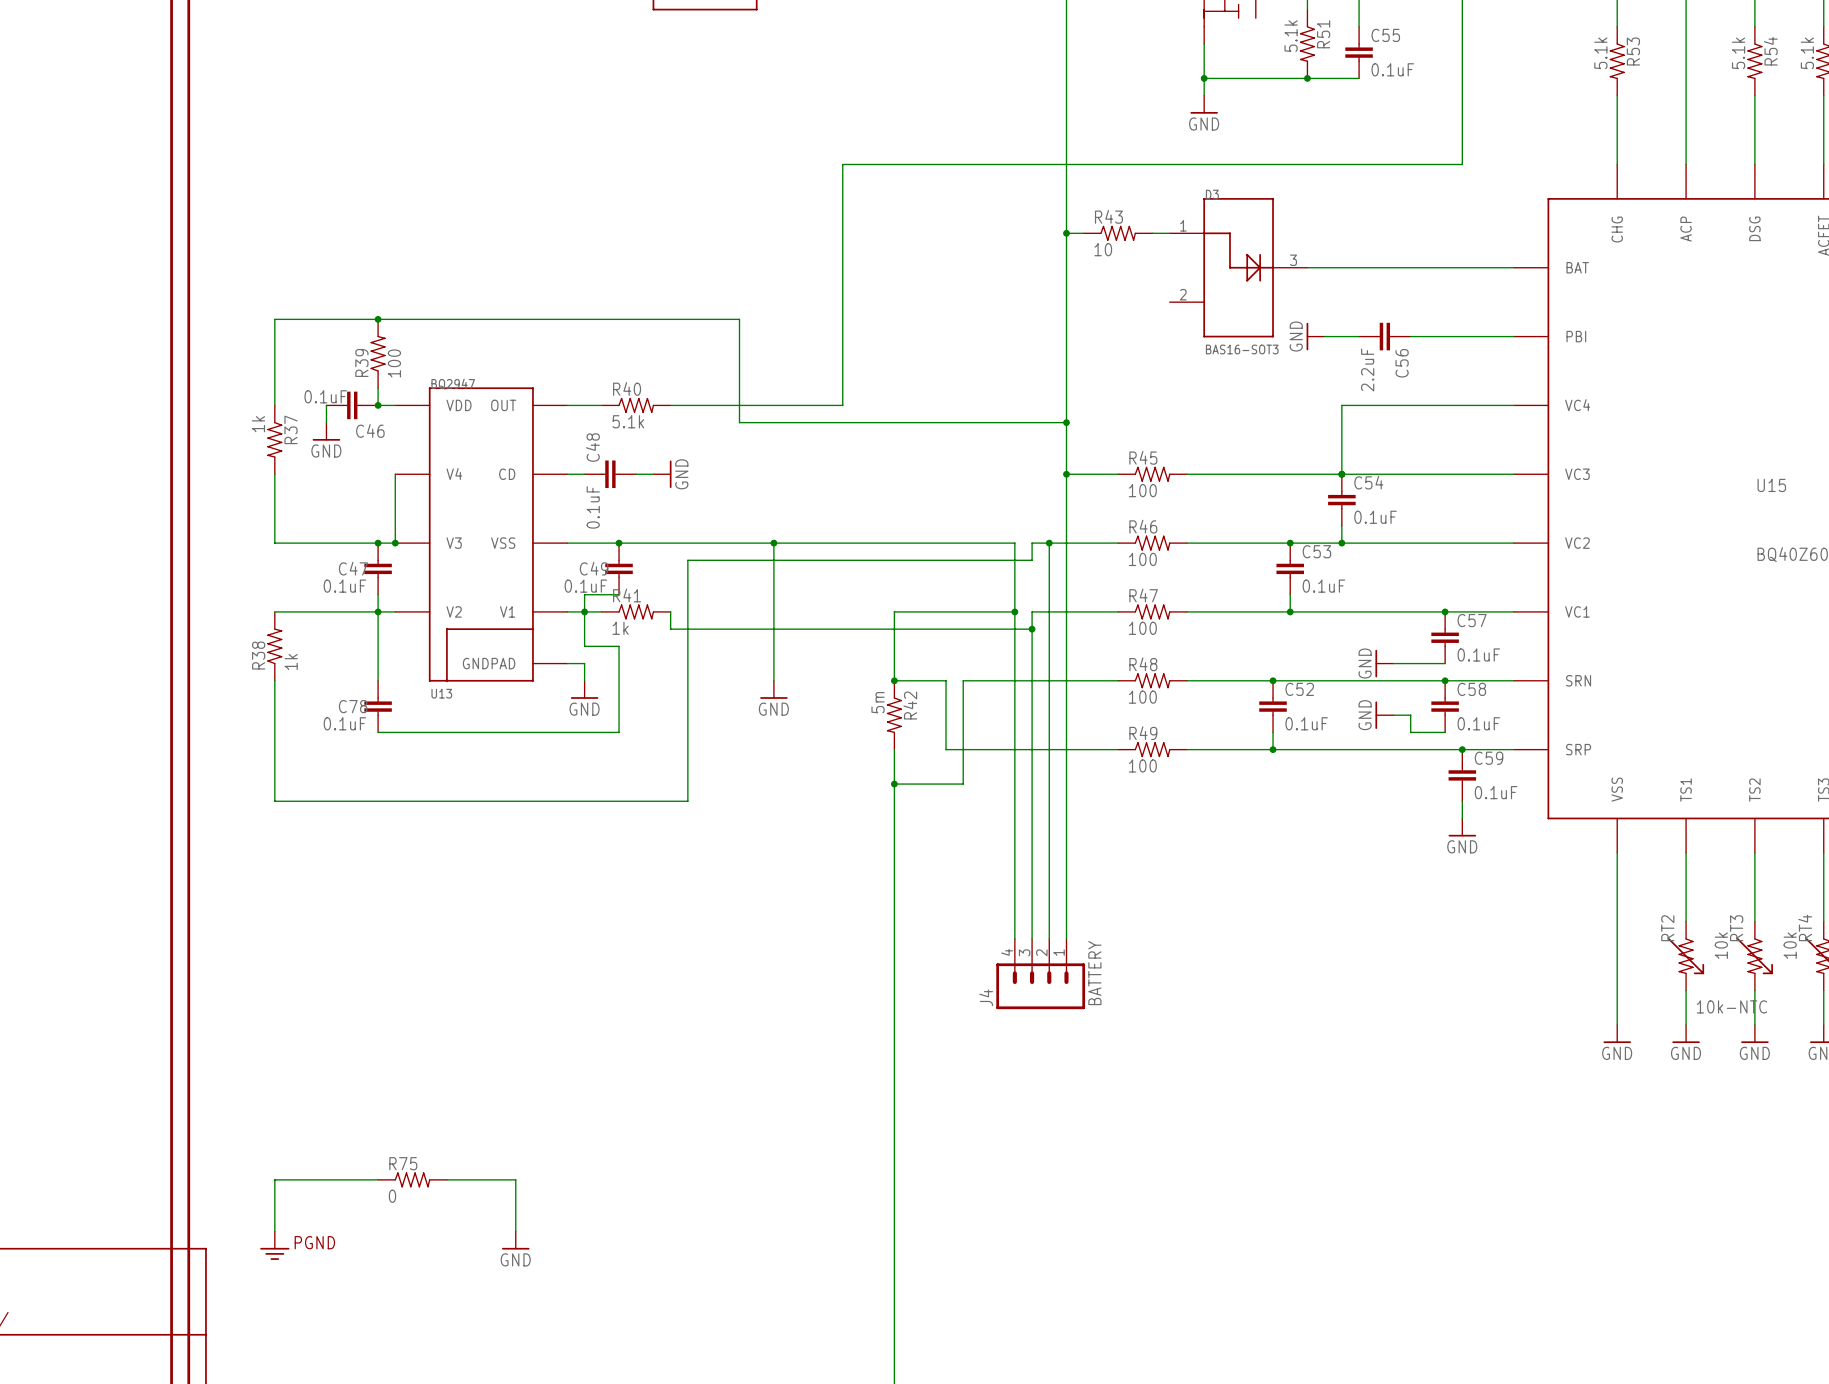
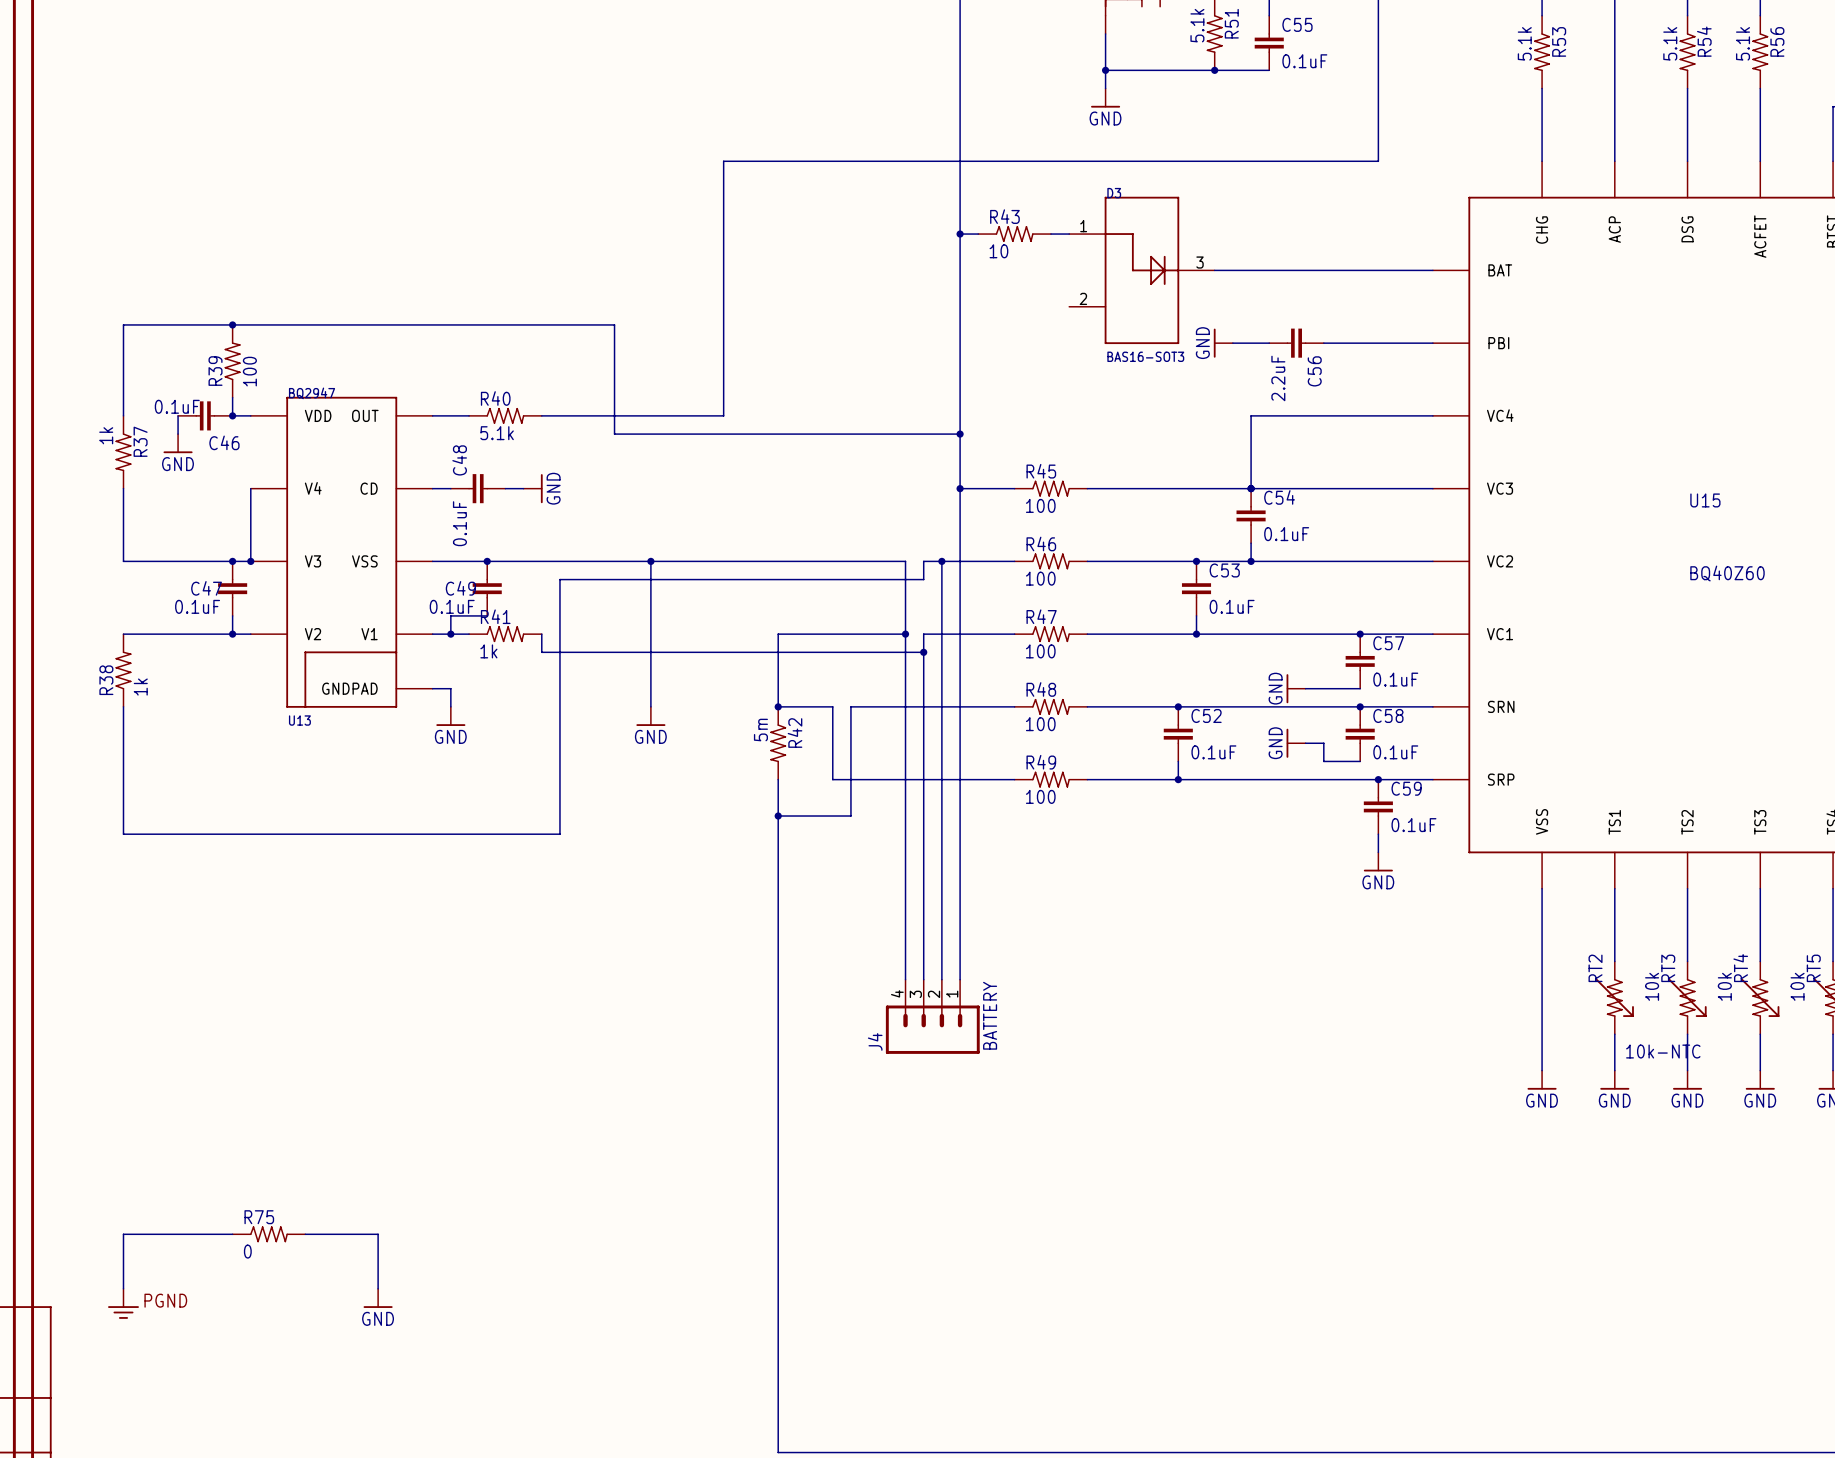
wire: (378, 611) (378, 680) -> none
wire: (584, 611) (584, 646) (619, 646) (619, 732) (378, 732) -> none
C78: 0.1uF (378, 706) -> none

